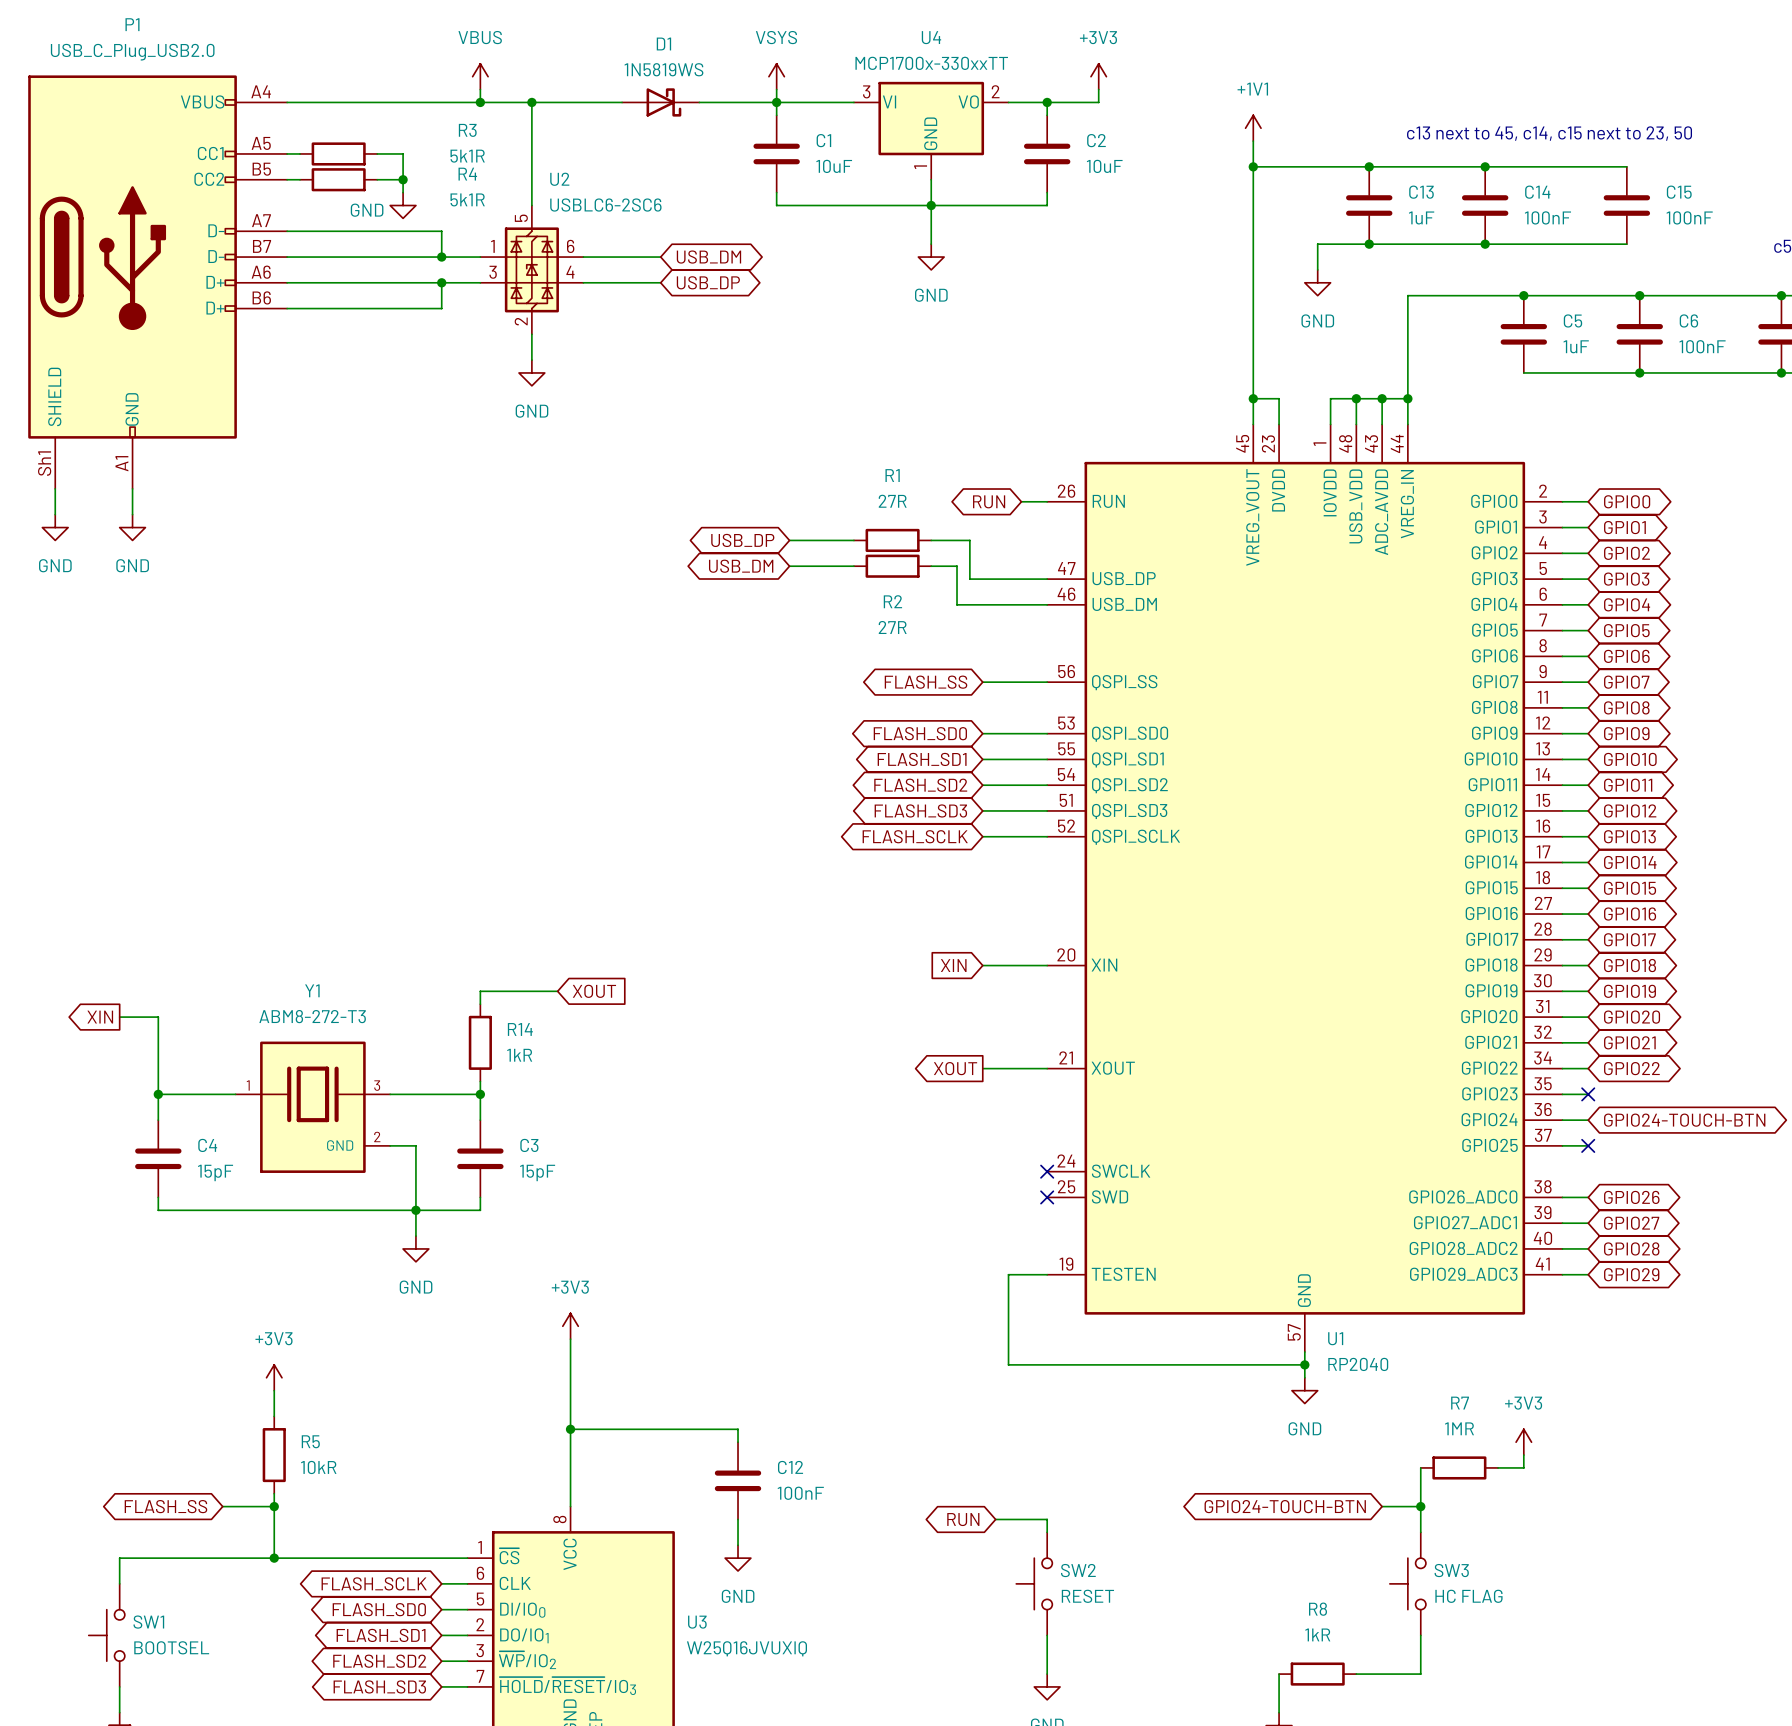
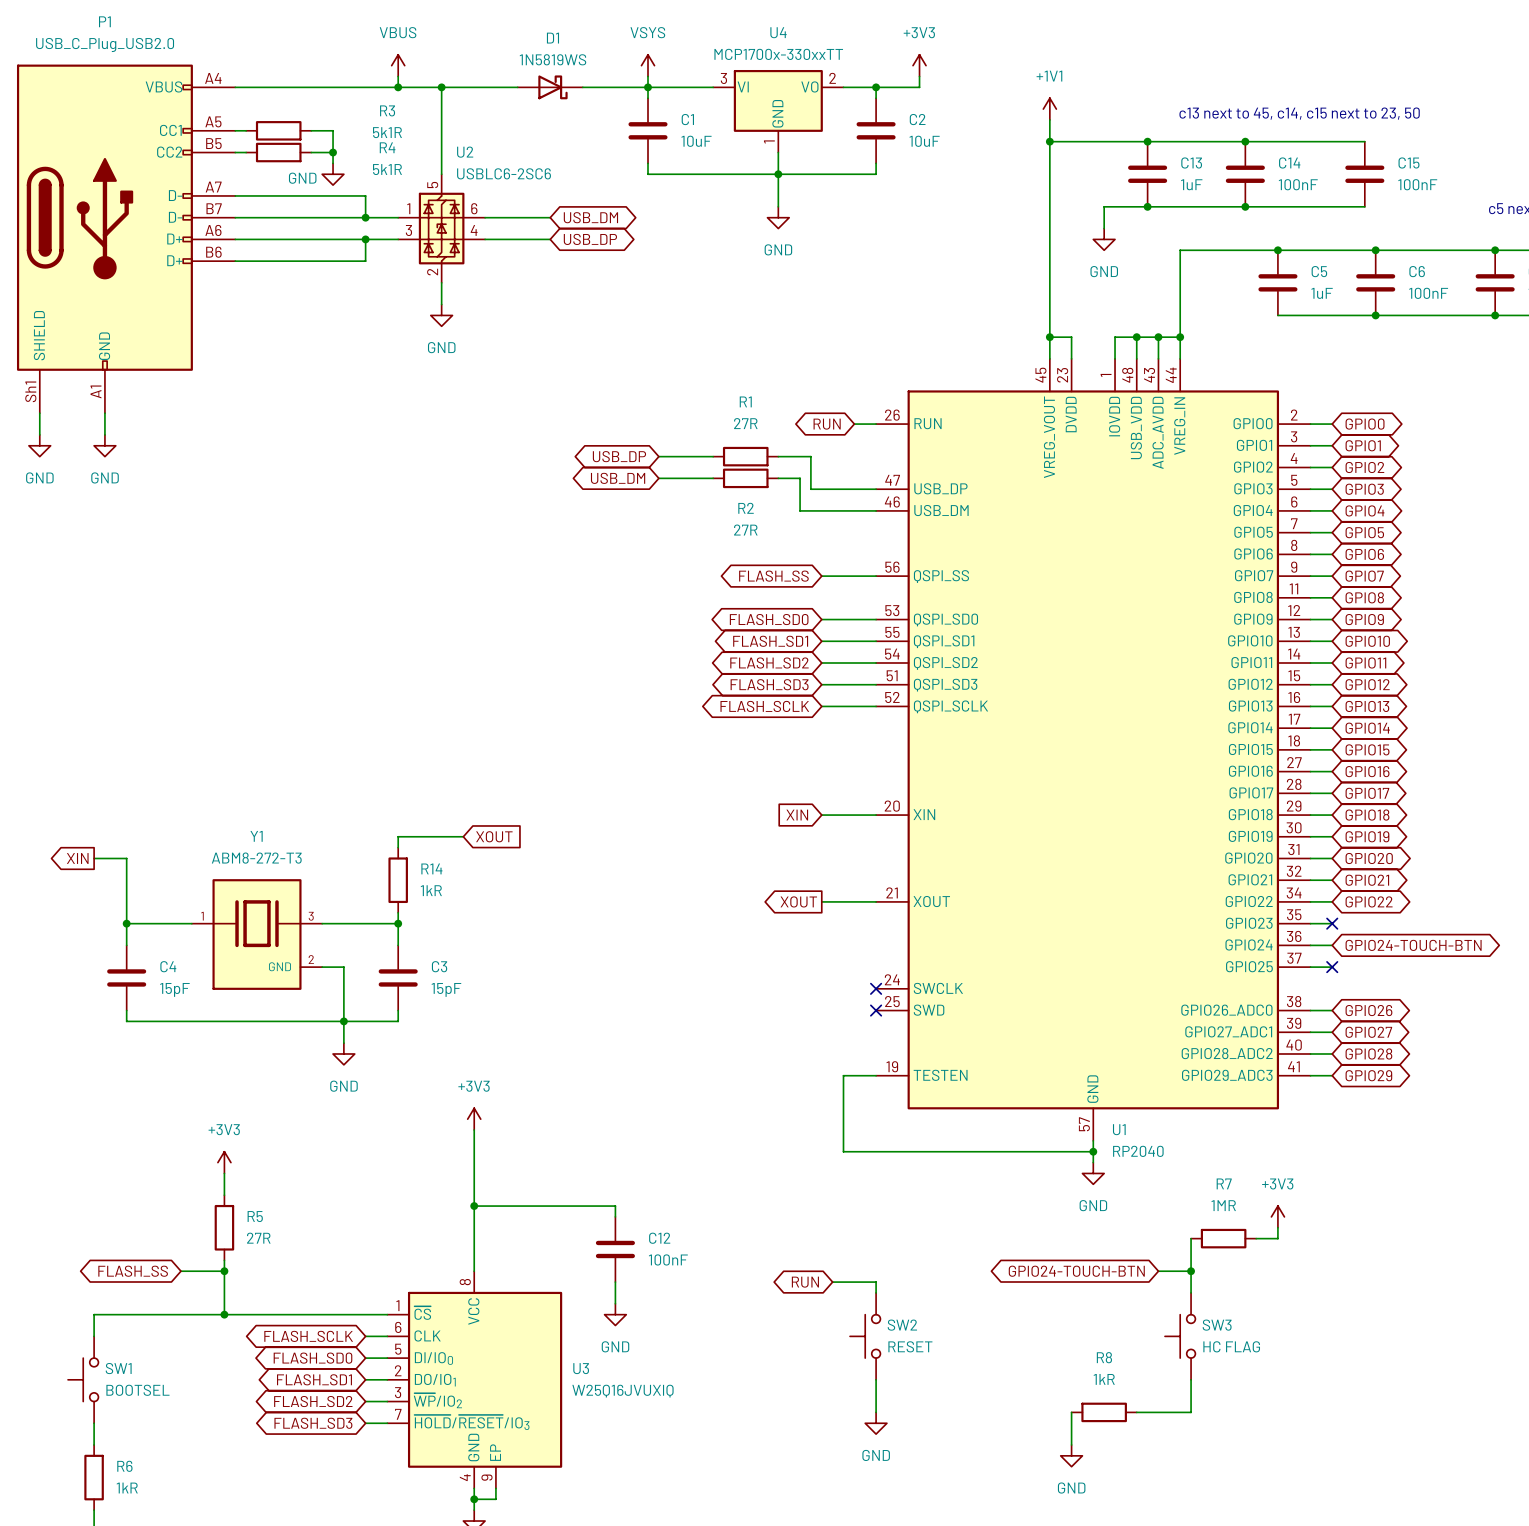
R5 value: 10kR (318, 1467) -> 27R (258, 1238)

